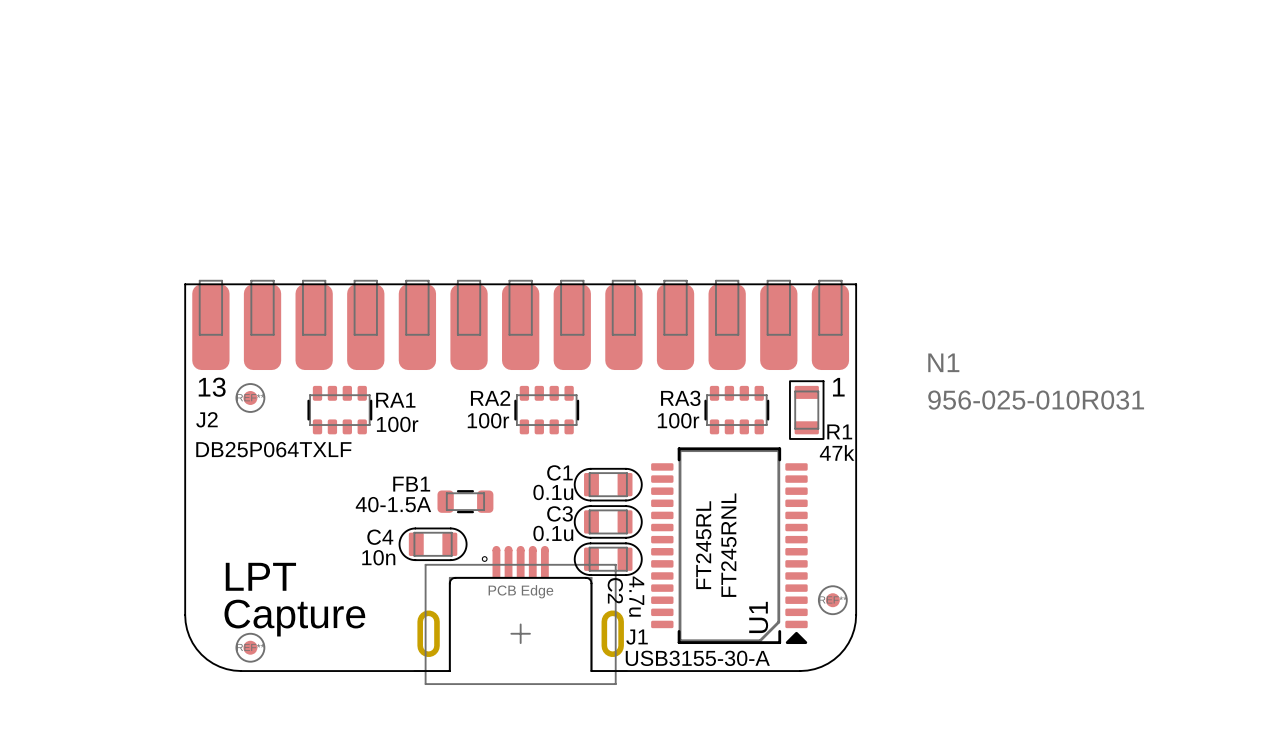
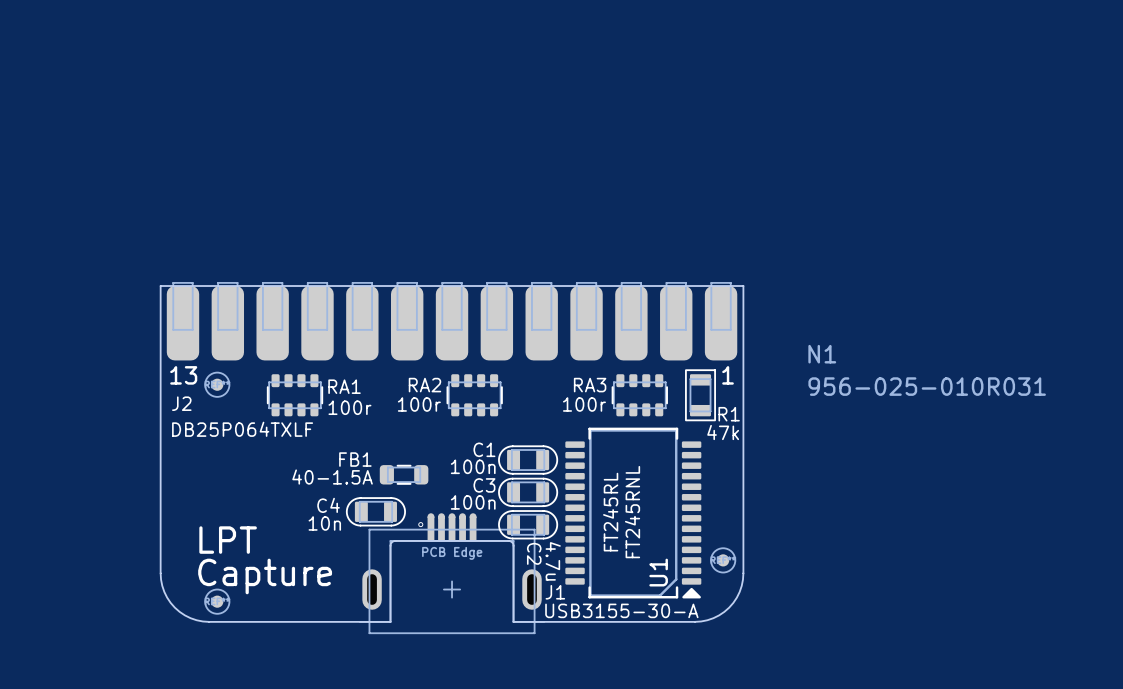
C1 value: 0.1u (553, 492) -> 100n (473, 466)
C3 value: 0.1u (553, 533) -> 100n (473, 502)

